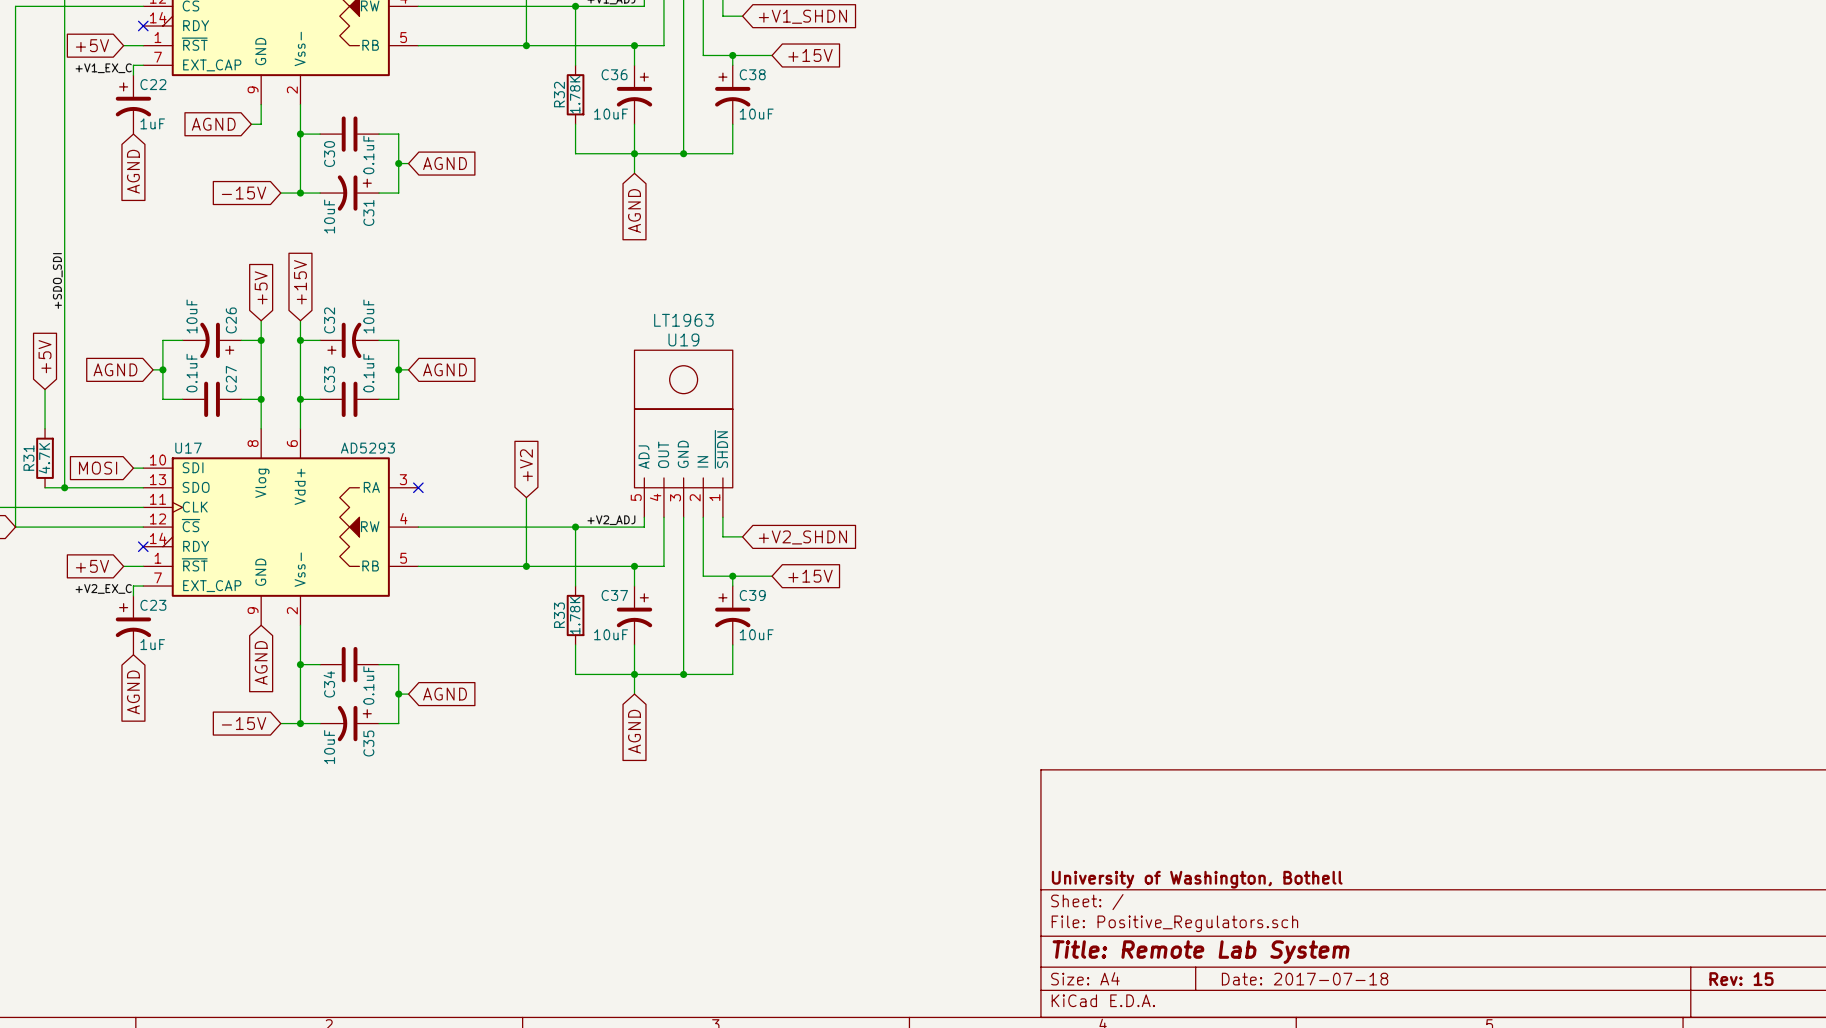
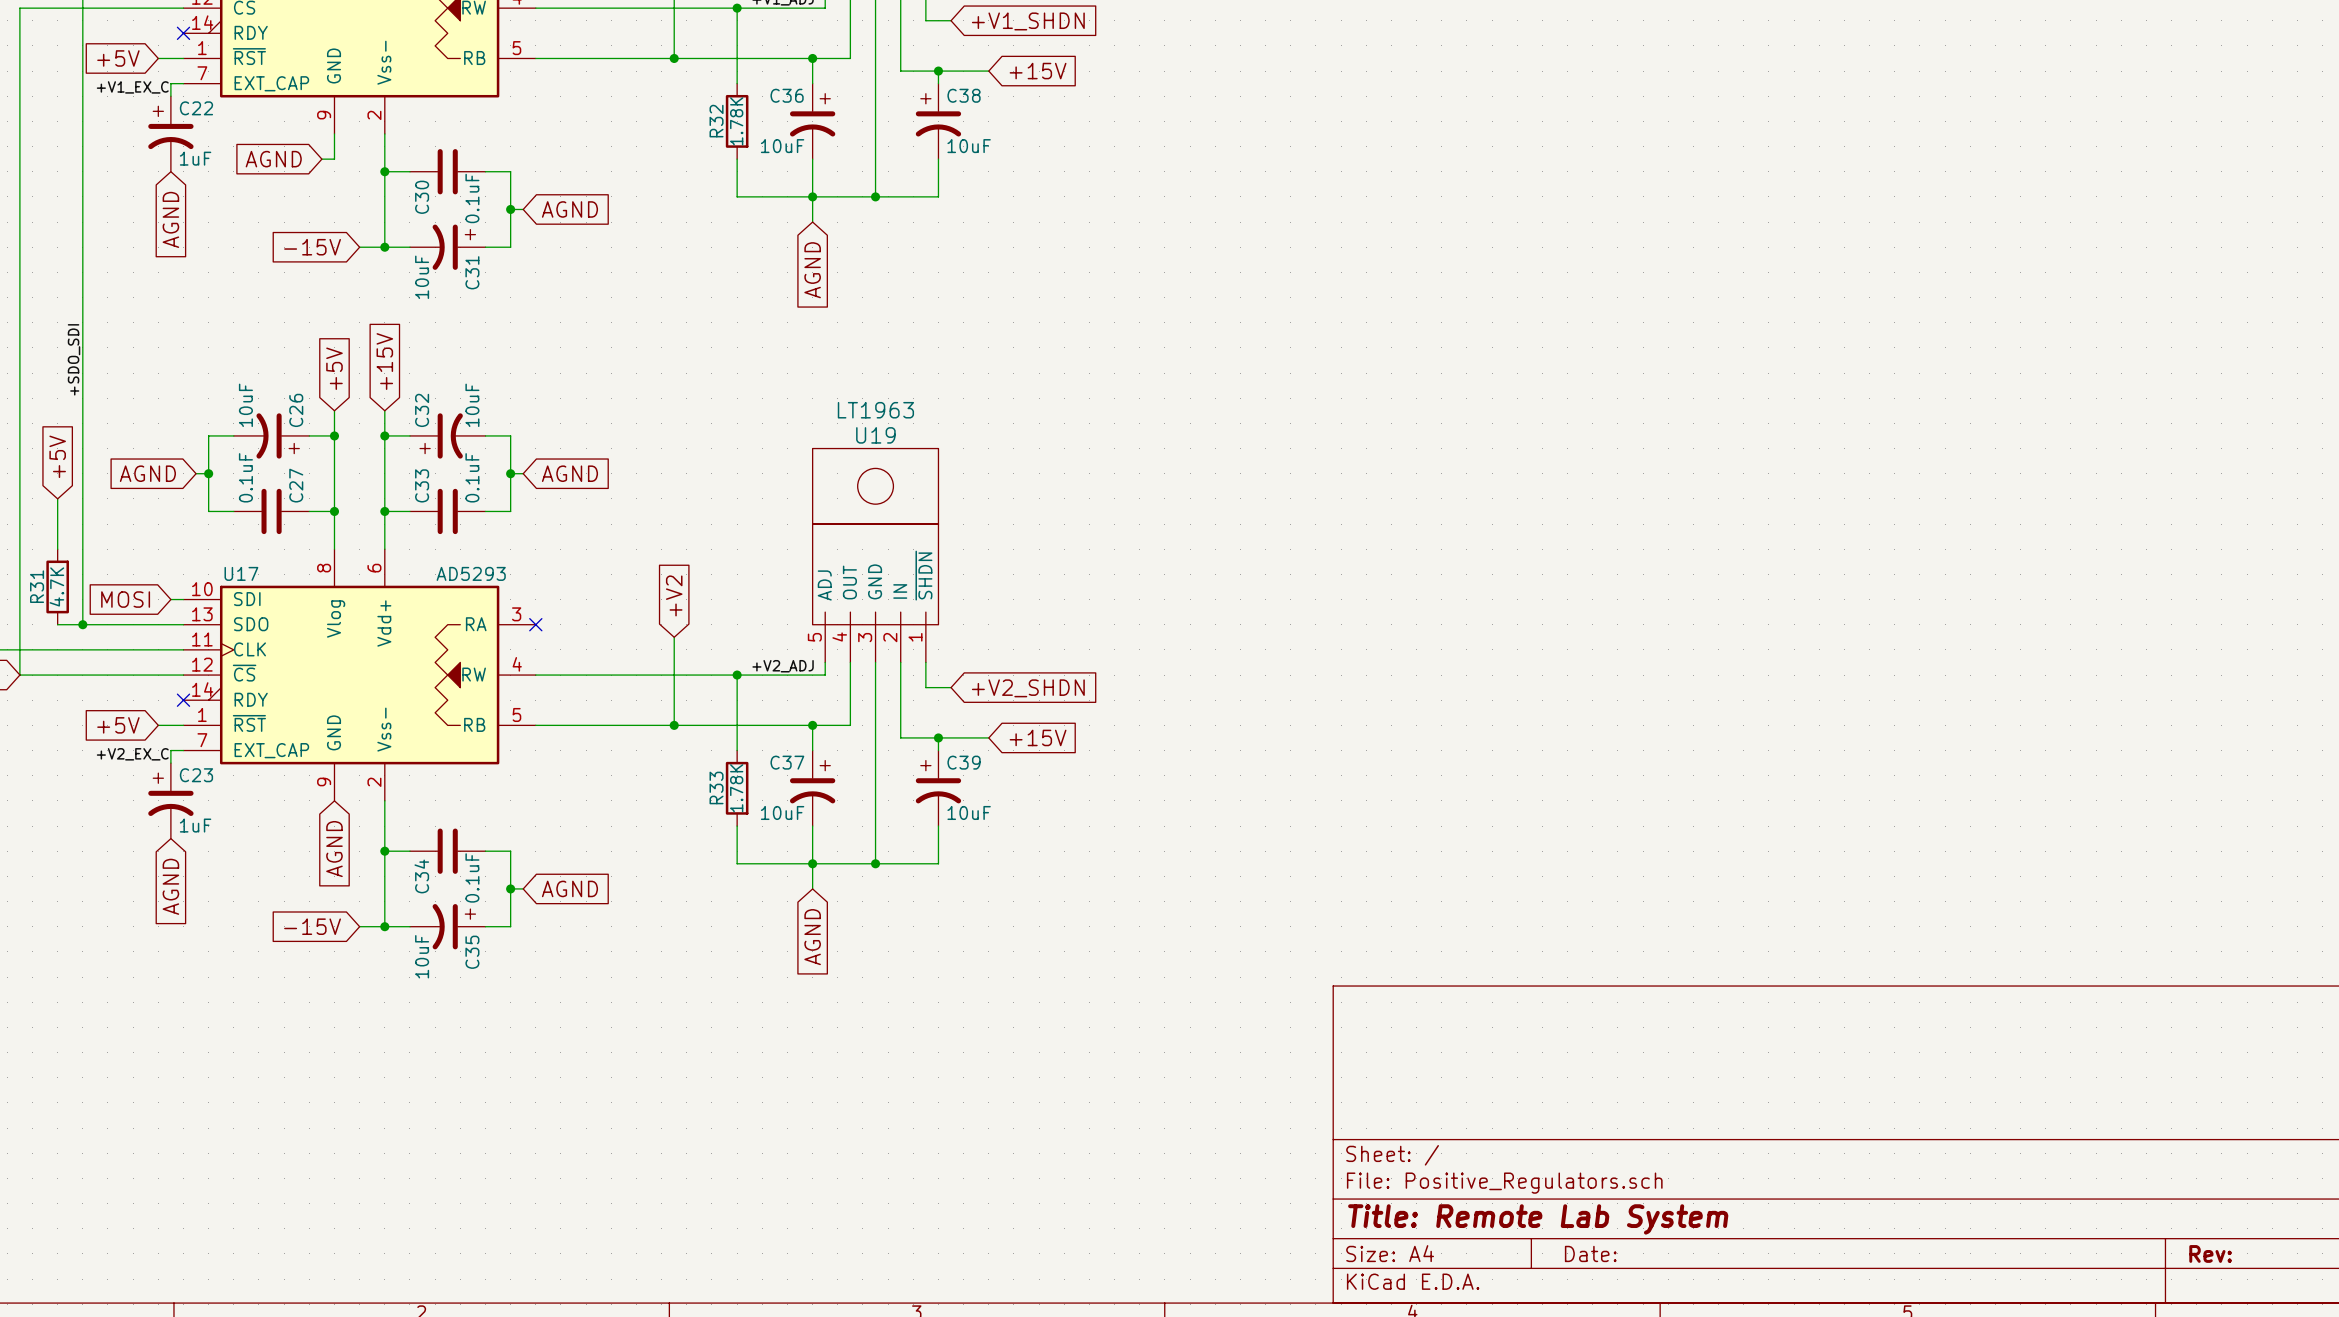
title block: University of Washington, Bothell (1197, 879) -> none
title block: Date: 2017-07-18 (1305, 979) -> Date: (1590, 1253)
title block: Rev: 15 (1741, 979) -> Rev: (2210, 1253)

